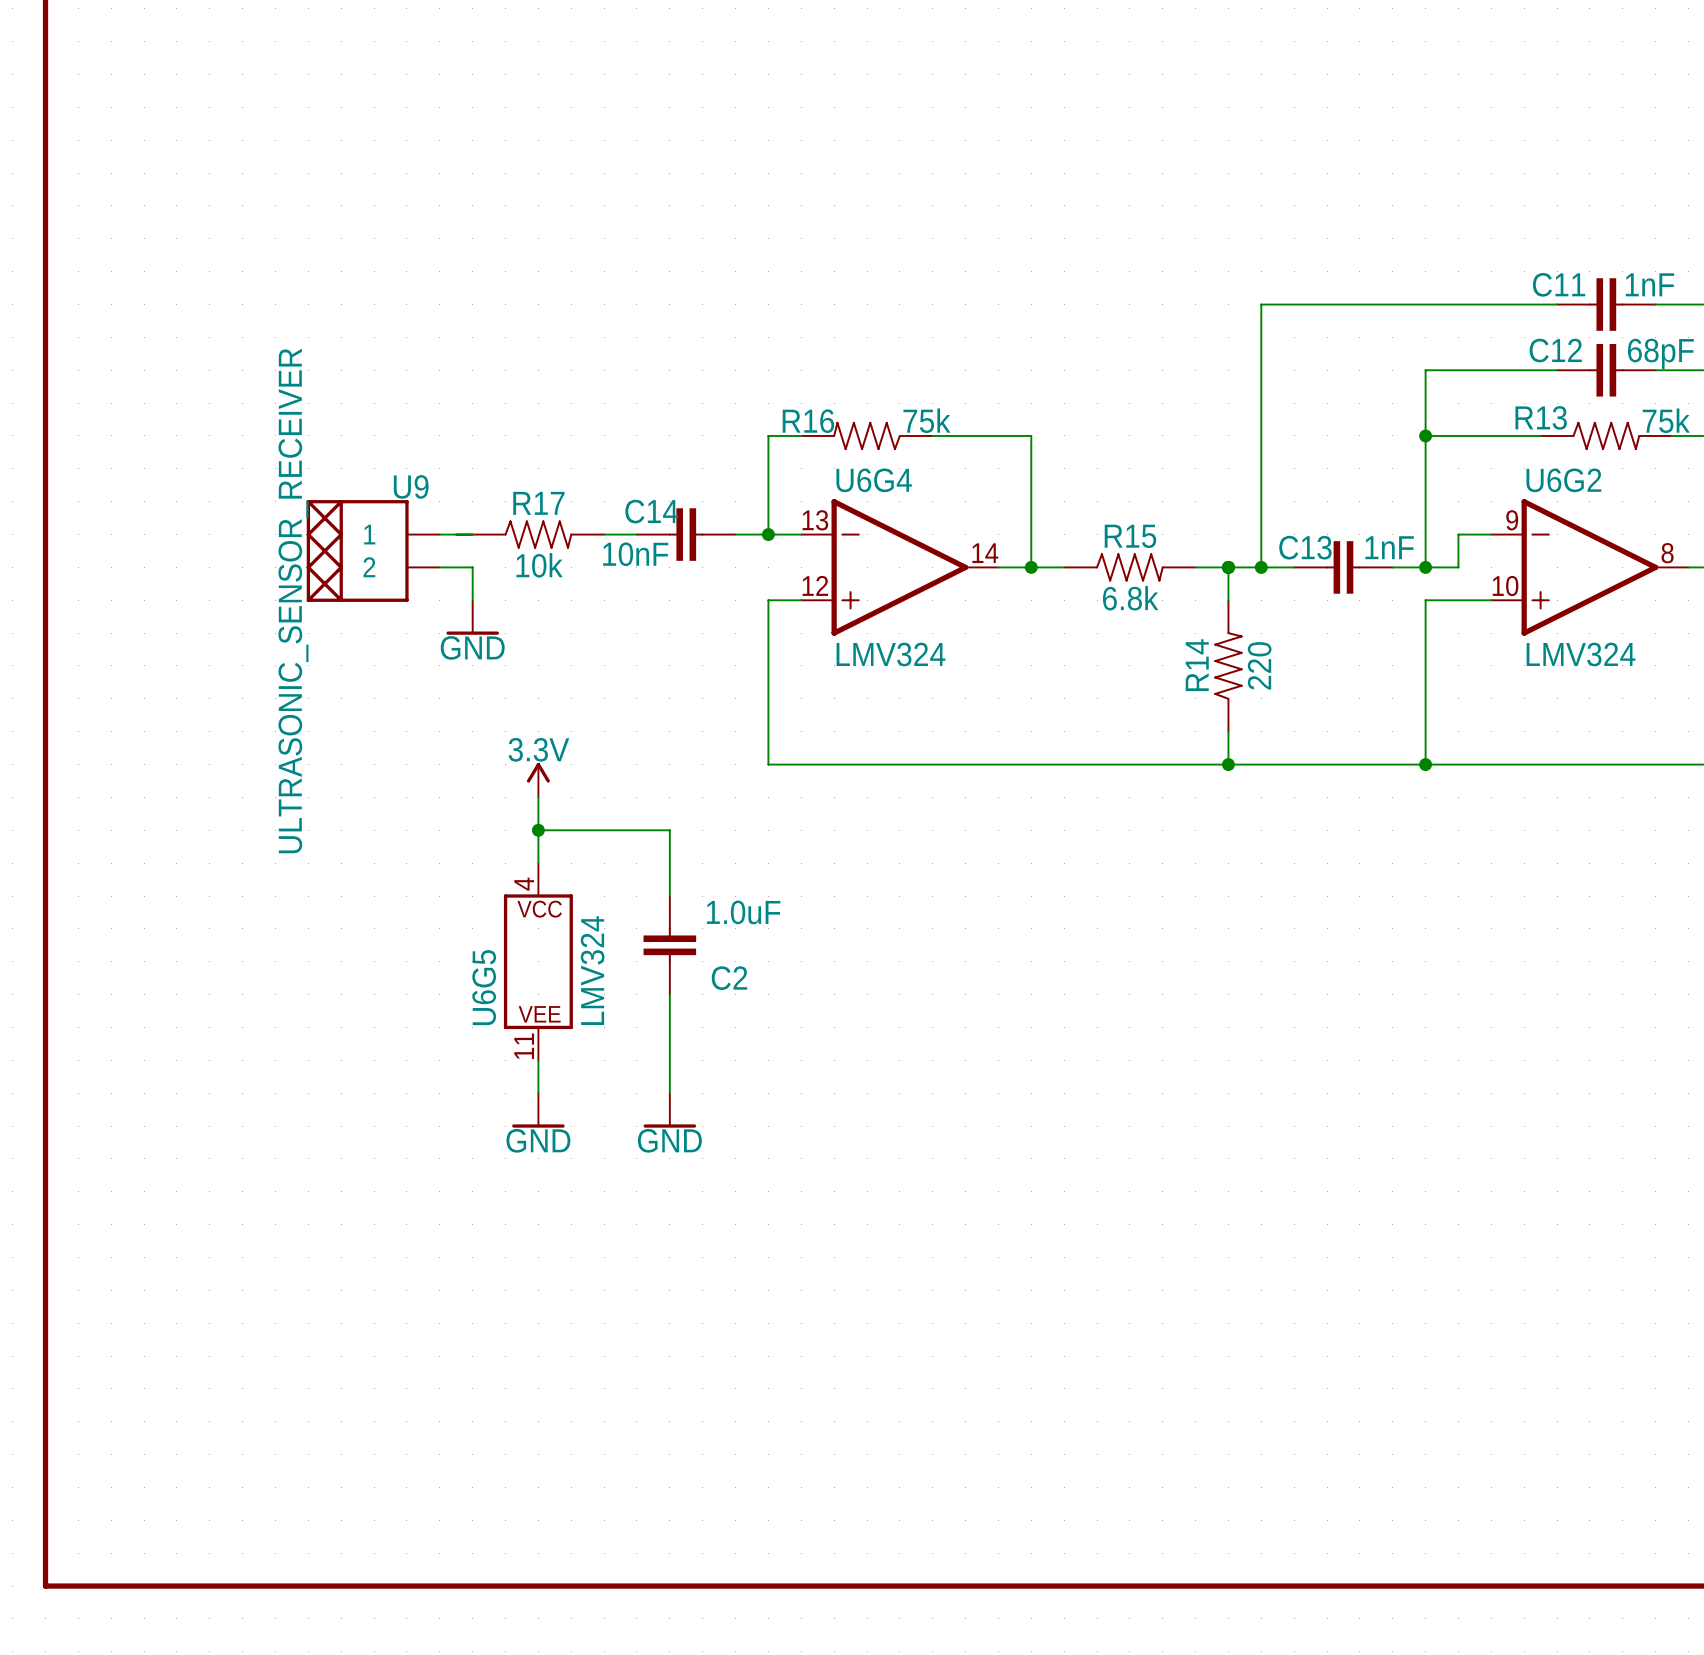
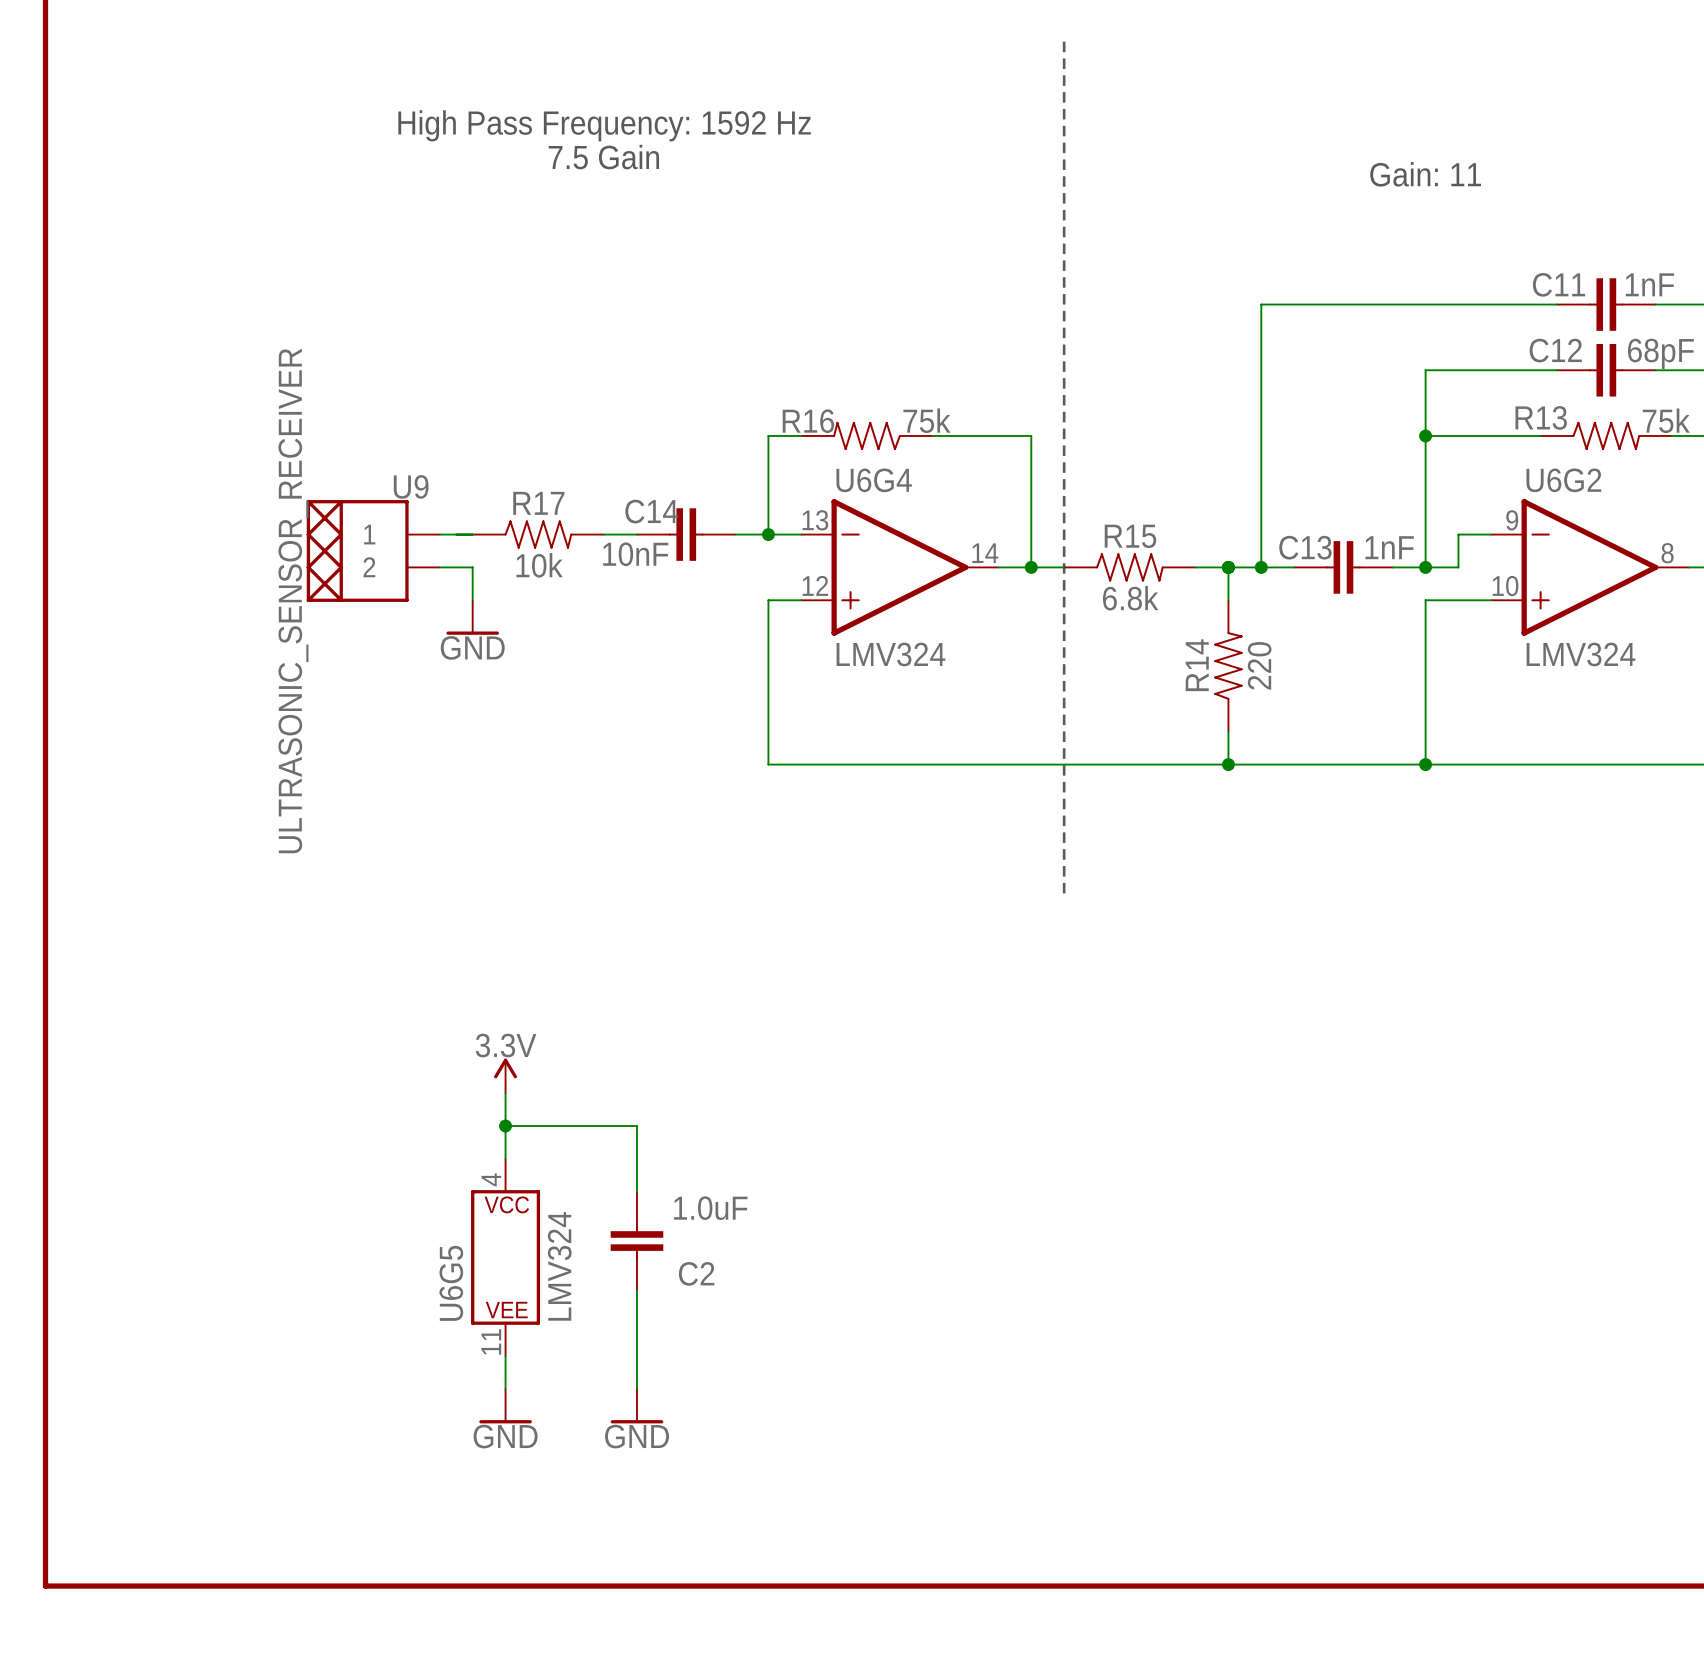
line: none -> (1064, 41) (1064, 896)
text: none -> High Pass Frequency: 1592 Hz (604, 125)
text: none -> 7.5 Gain (603, 157)
text: none -> Gain: 11 (1425, 174)
power symbol position: 3.3V (538, 780) -> 3.3V (505, 1075)
wire: (538, 797) (538, 863) -> (505, 1093) (505, 1158)
wire: (538, 830) (669, 830) (669, 896) -> (505, 1126) (636, 1126) (636, 1191)
junction: (538, 830) -> none
C2 position: (669, 945) -> (636, 1241)
U6G5 position: (538, 961) -> (505, 1257)
wire: (669, 994) (669, 1093) -> (636, 1290) (636, 1388)
wire: (538, 1060) (538, 1093) -> (505, 1356) (505, 1388)
power symbol: GND (538, 1110) -> none
power symbol: GND (669, 1110) -> none
junction: none -> (505, 1126)
power symbol: none -> GND (505, 1406)
power symbol: none -> GND (636, 1406)

